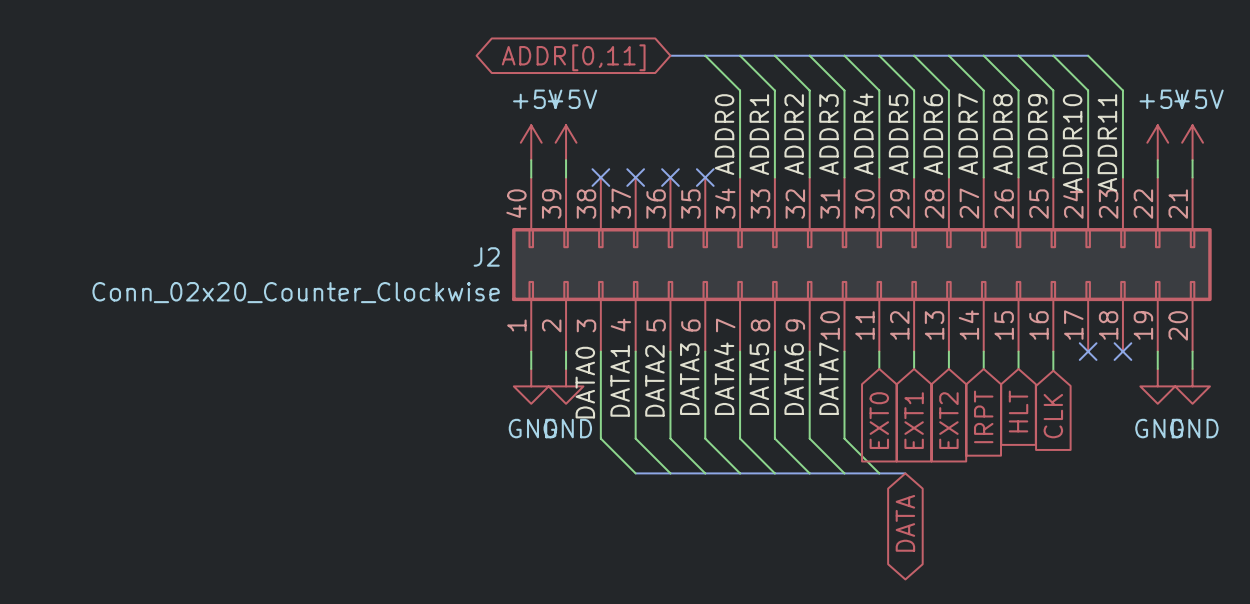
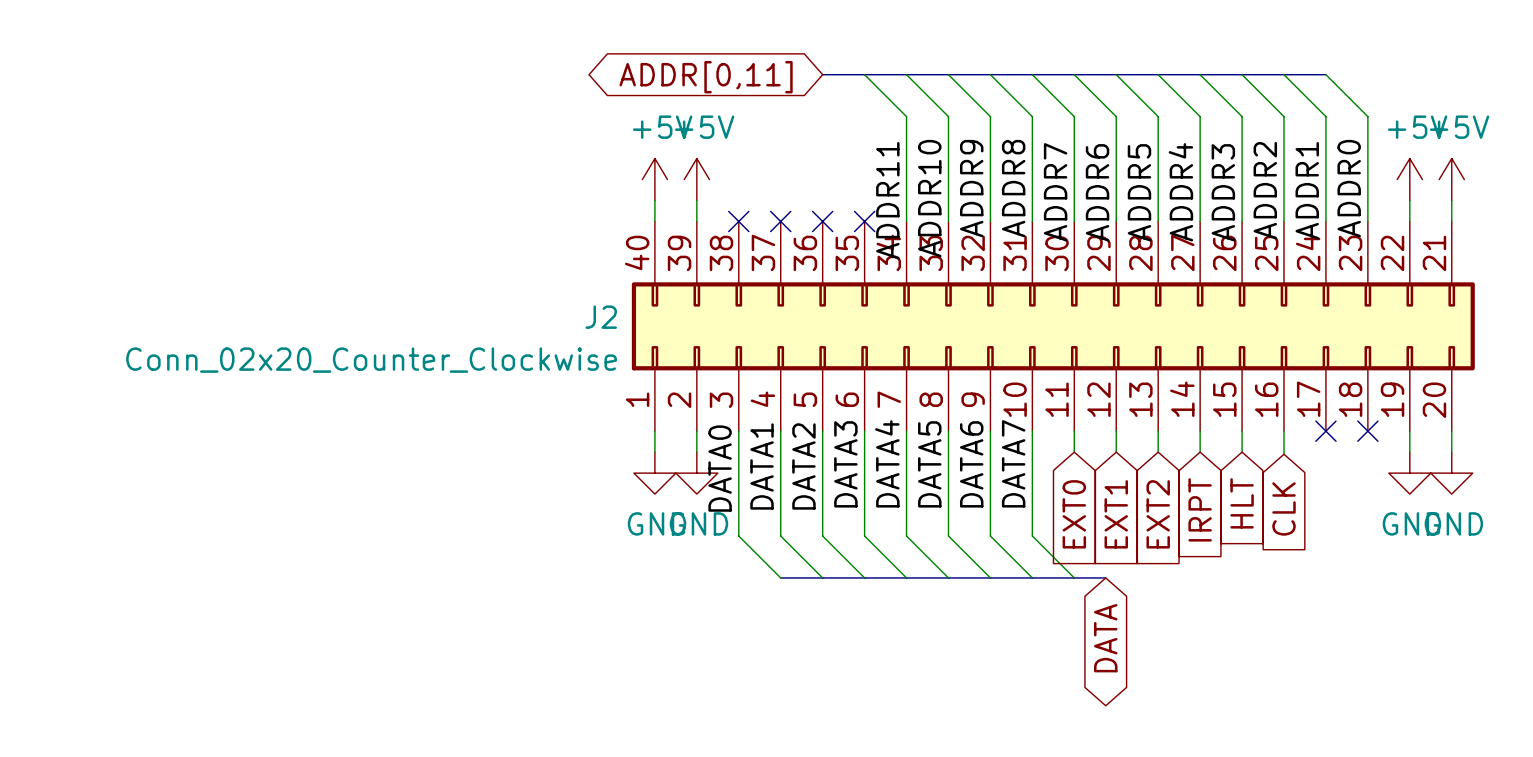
label: ADDR0 (724, 134) -> ADDR11 (887, 200)
label position: ADDR1 (759, 134) -> ADDR1 (1307, 190)
label position: ADDR2 (794, 134) -> ADDR2 (1265, 190)
label position: ADDR3 (828, 134) -> ADDR3 (1223, 192)
label position: ADDR4 (863, 134) -> ADDR4 (1180, 192)
label position: ADDR5 (898, 134) -> ADDR5 (1139, 192)
label position: ADDR6 (933, 134) -> ADDR6 (1097, 192)
label position: ADDR7 (968, 134) -> ADDR7 (1055, 192)
label position: ADDR8 (1003, 134) -> ADDR8 (1013, 188)
label position: ADDR9 (1037, 134) -> ADDR9 (971, 188)
label position: ADDR10 (1072, 142) -> ADDR10 (929, 198)
label: ADDR11 (1107, 142) -> ADDR0 (1349, 188)

